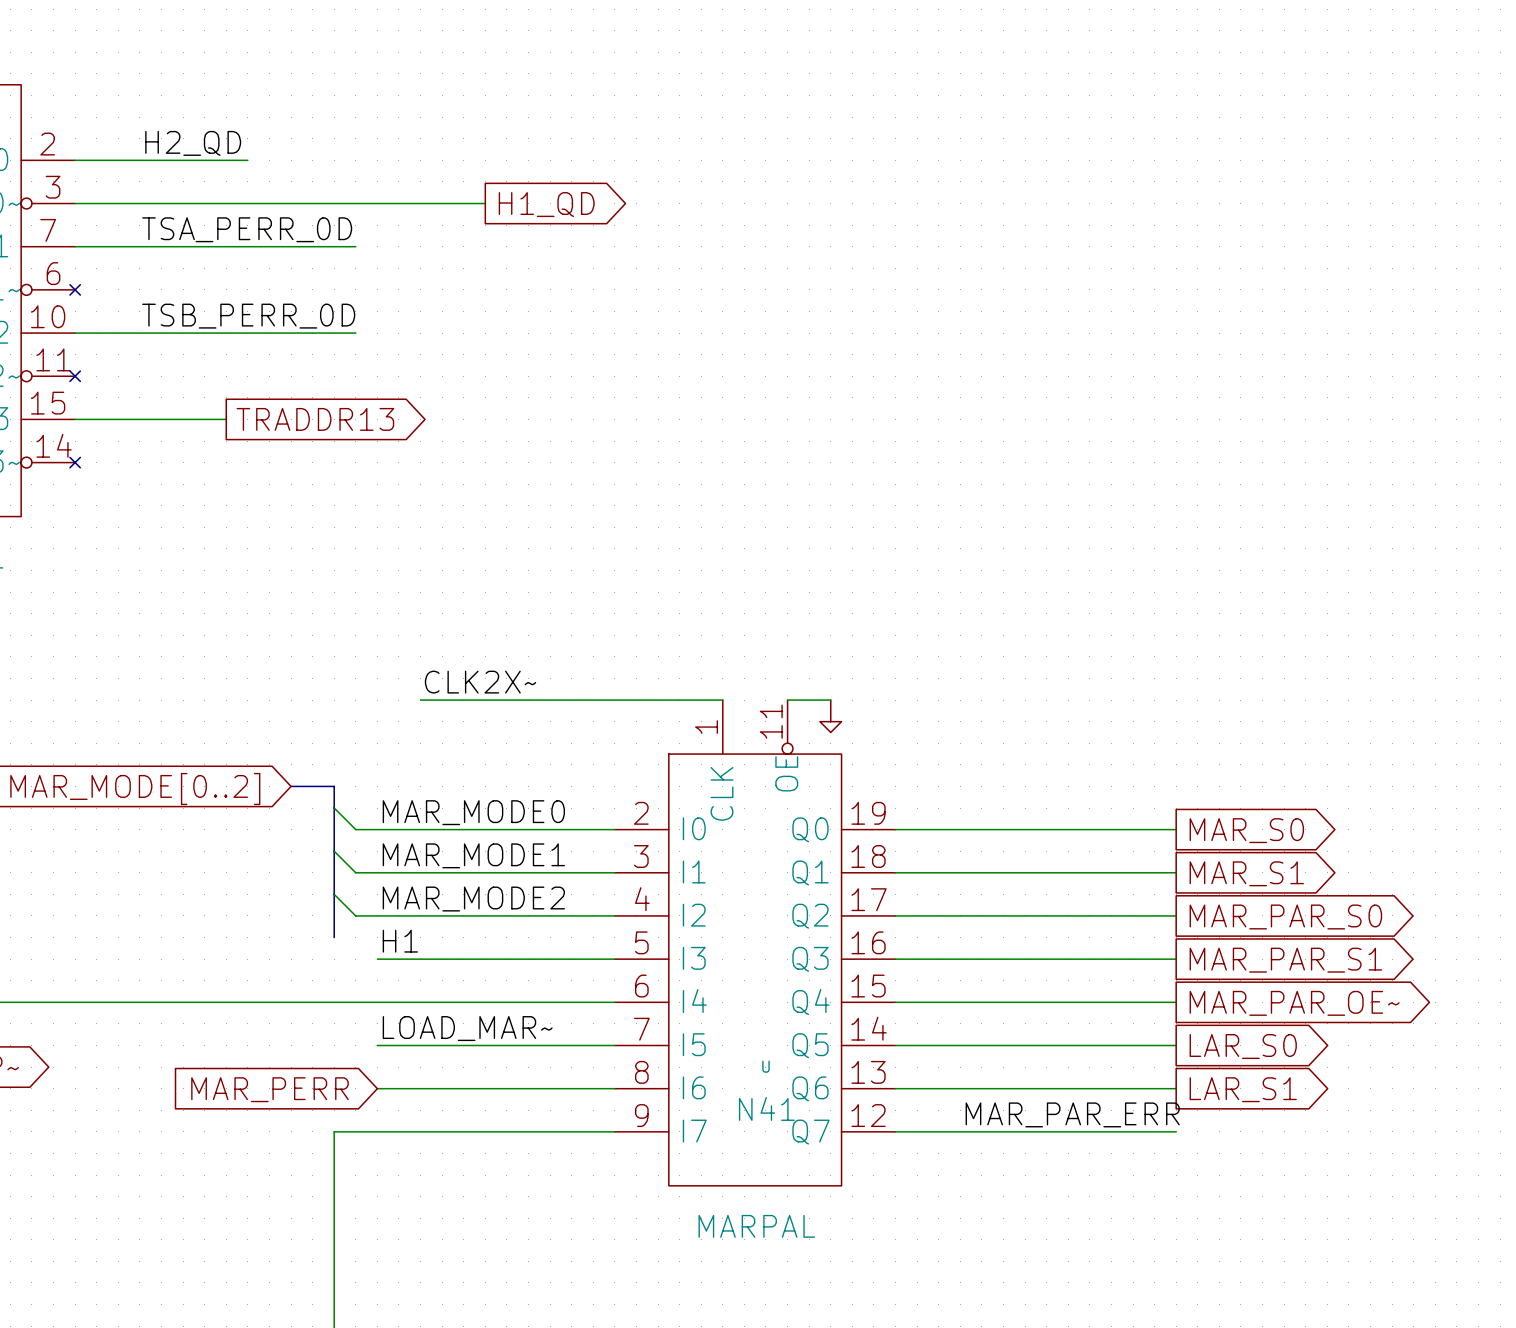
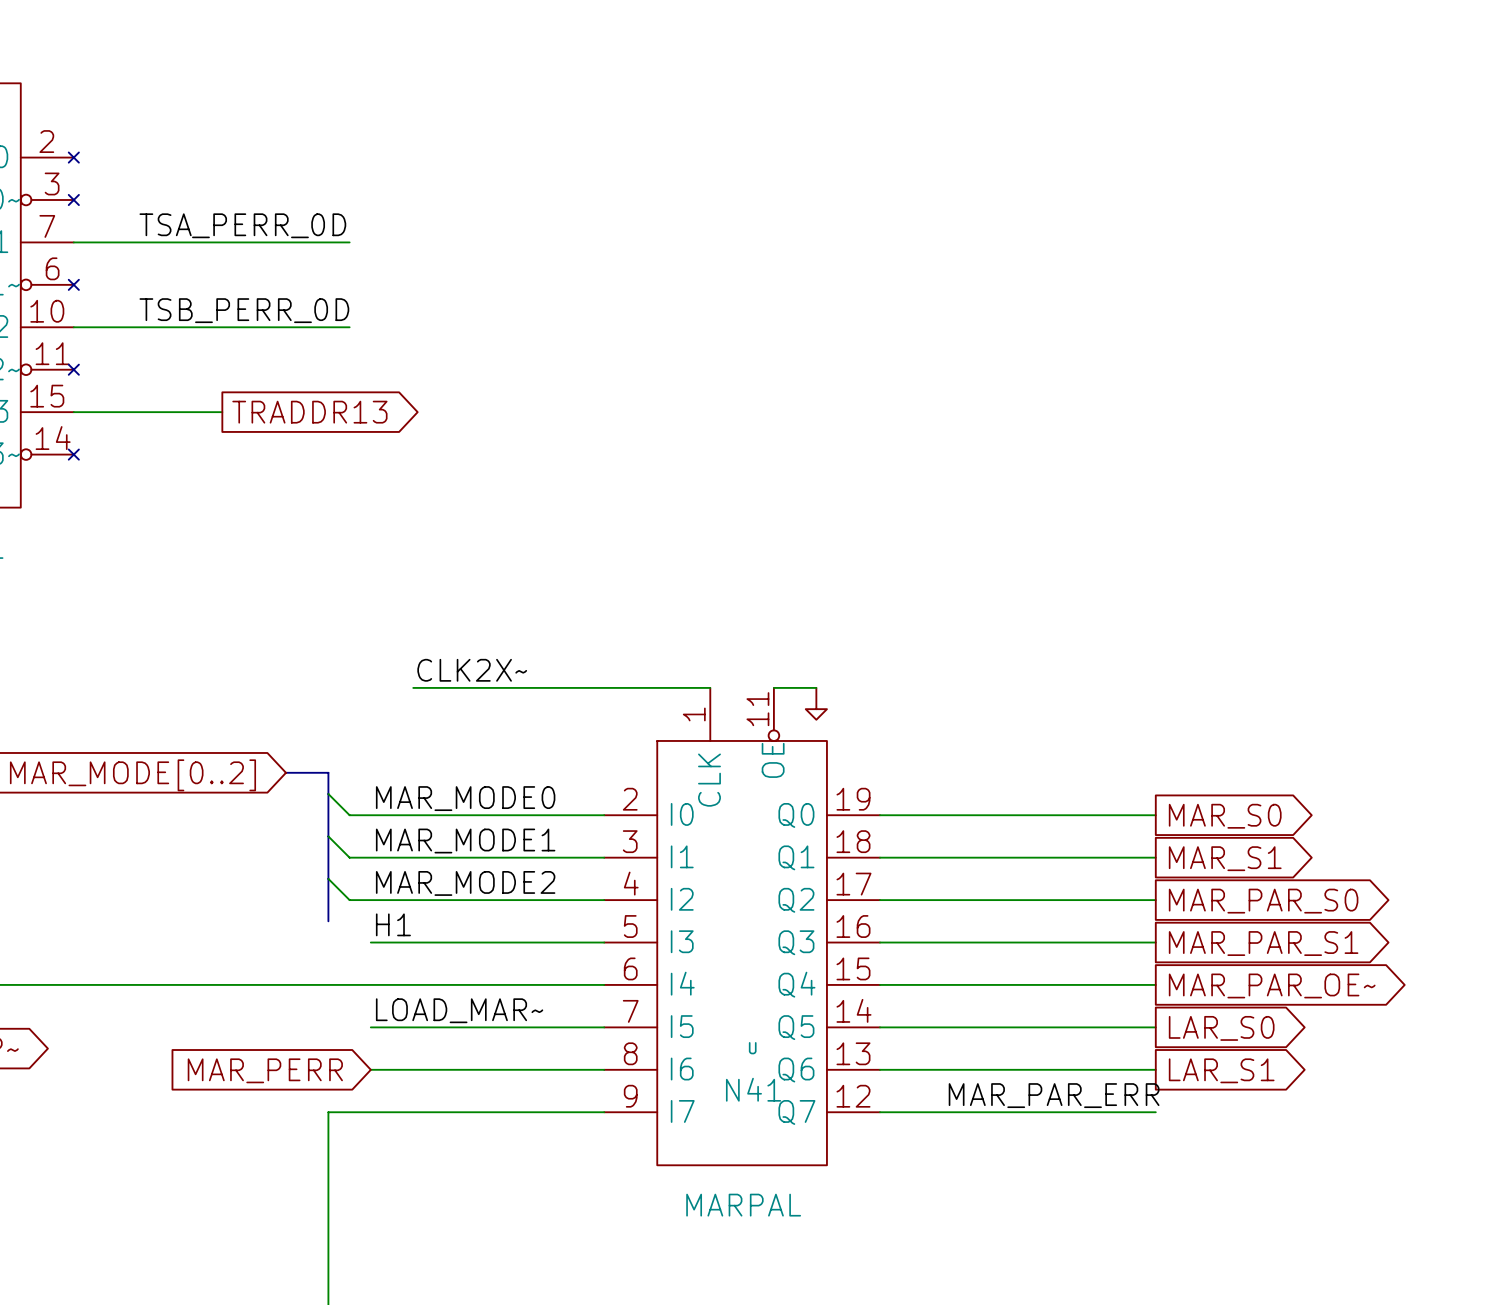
label: H2_QD (193, 143) -> none
wire: (75, 160) (247, 160) -> none
no-connect mark: none -> (73, 157)
wire: (75, 203) (485, 203) -> none
no-connect mark: none -> (73, 199)
global label: H1_QD (546, 204) -> none

